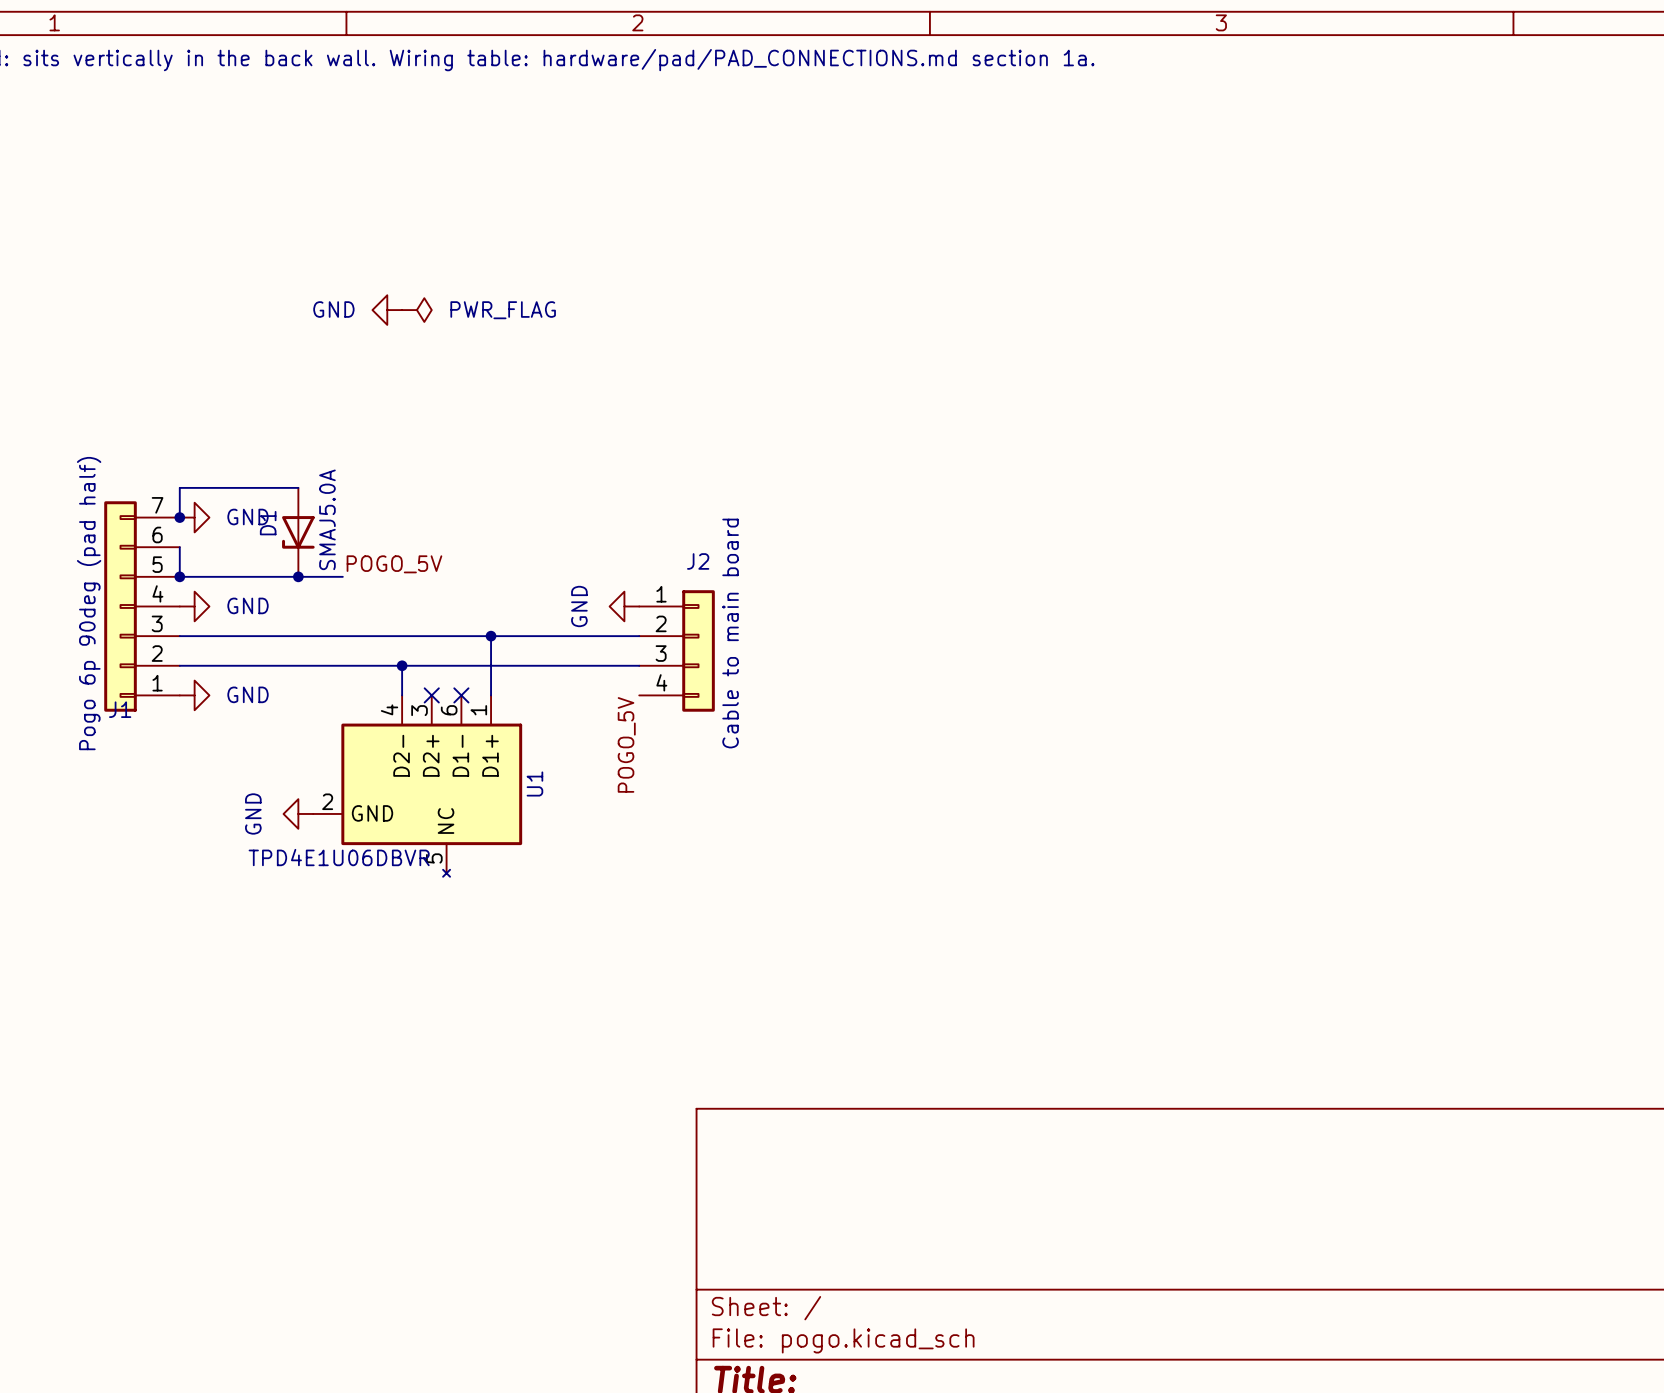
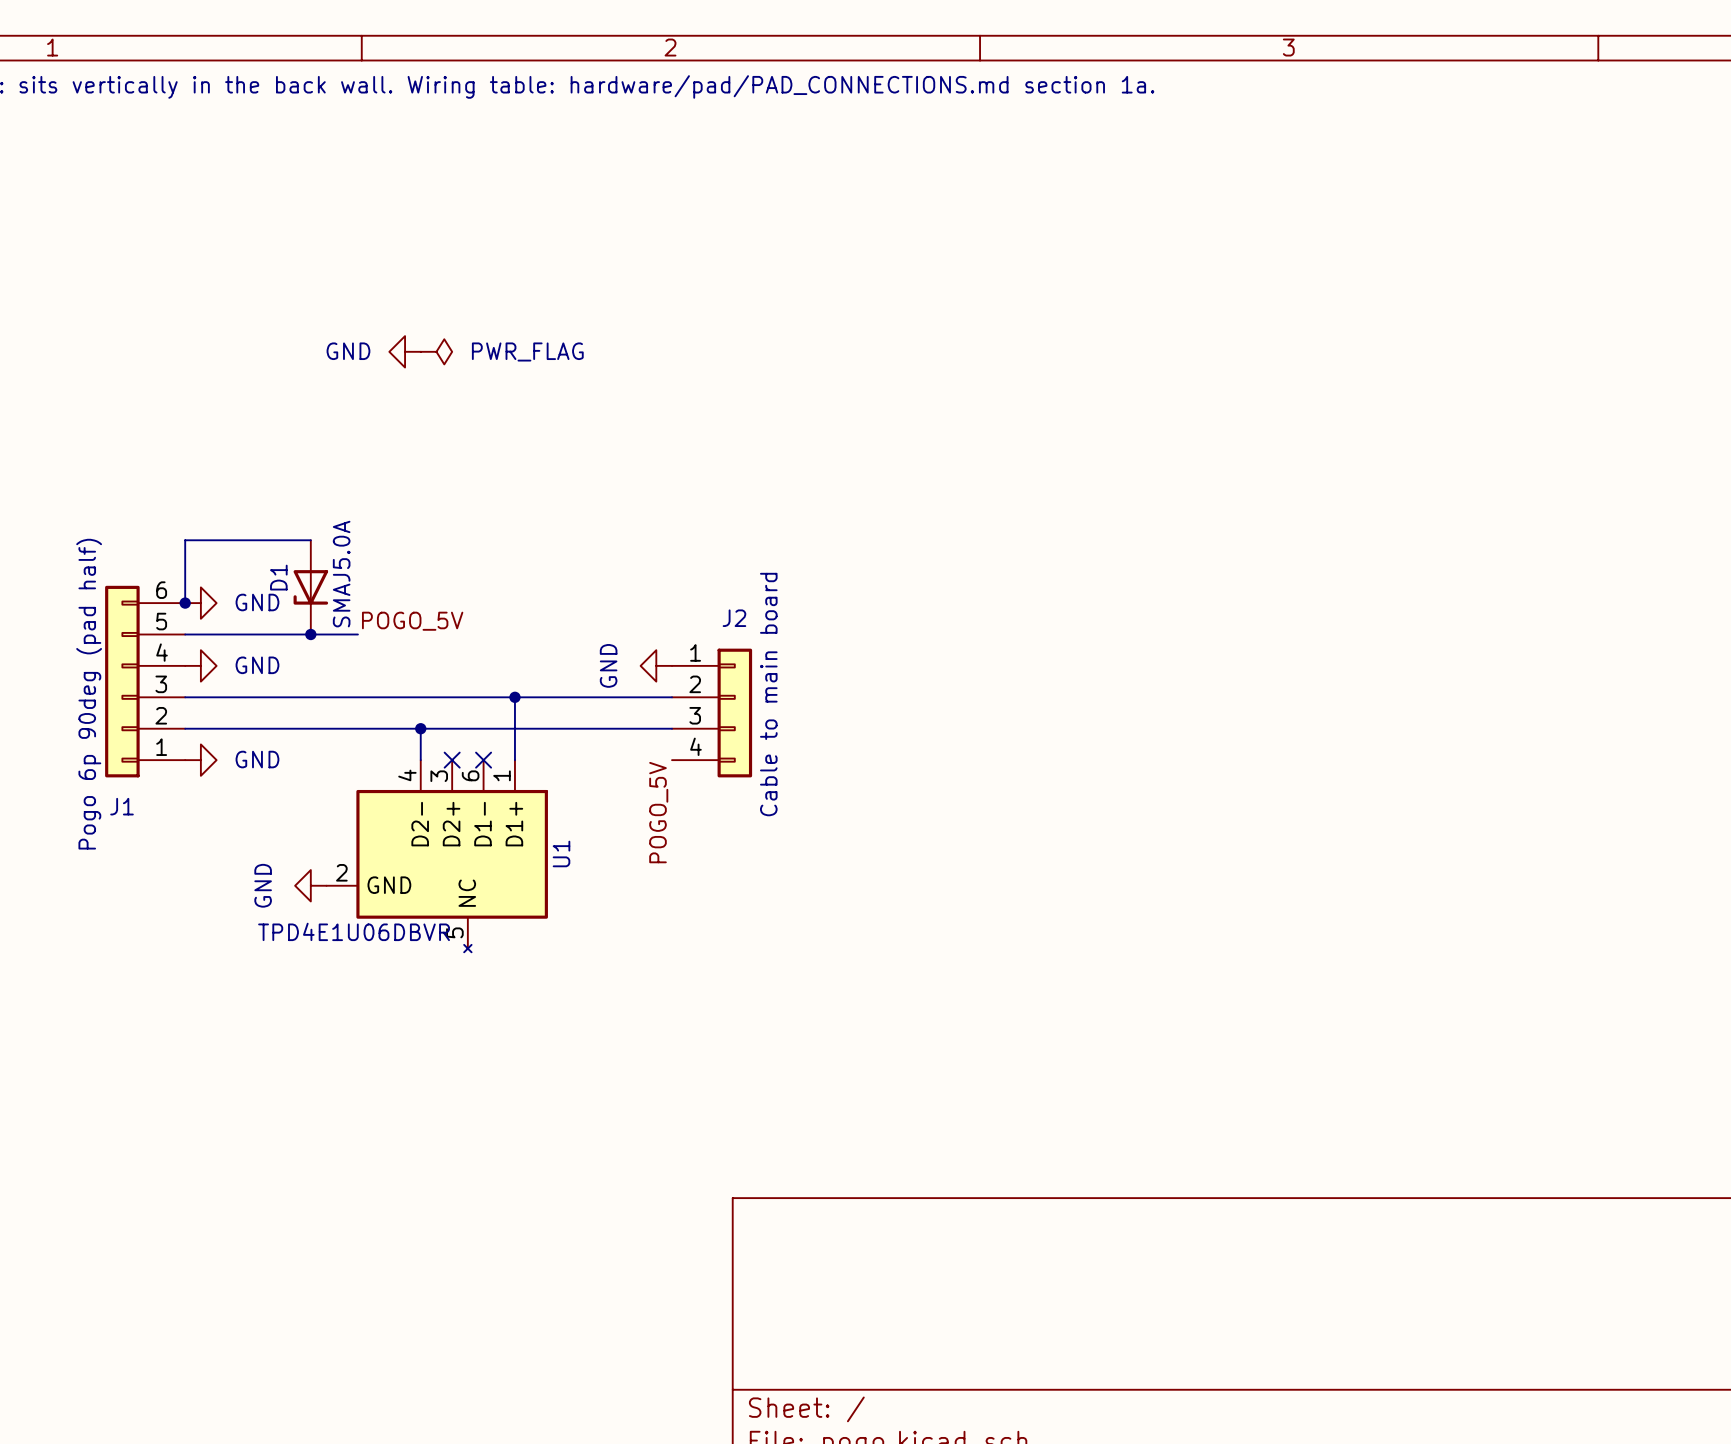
J1 symbol: [104, 501, 180, 712] -> [105, 585, 186, 778]
junction: (179, 517) -> none
power symbol position: GND (194, 517) -> GND (200, 603)
wire: (179, 547) (179, 576) -> (185, 603) (185, 571)
junction: none -> (185, 603)
junction: (179, 576) -> none

